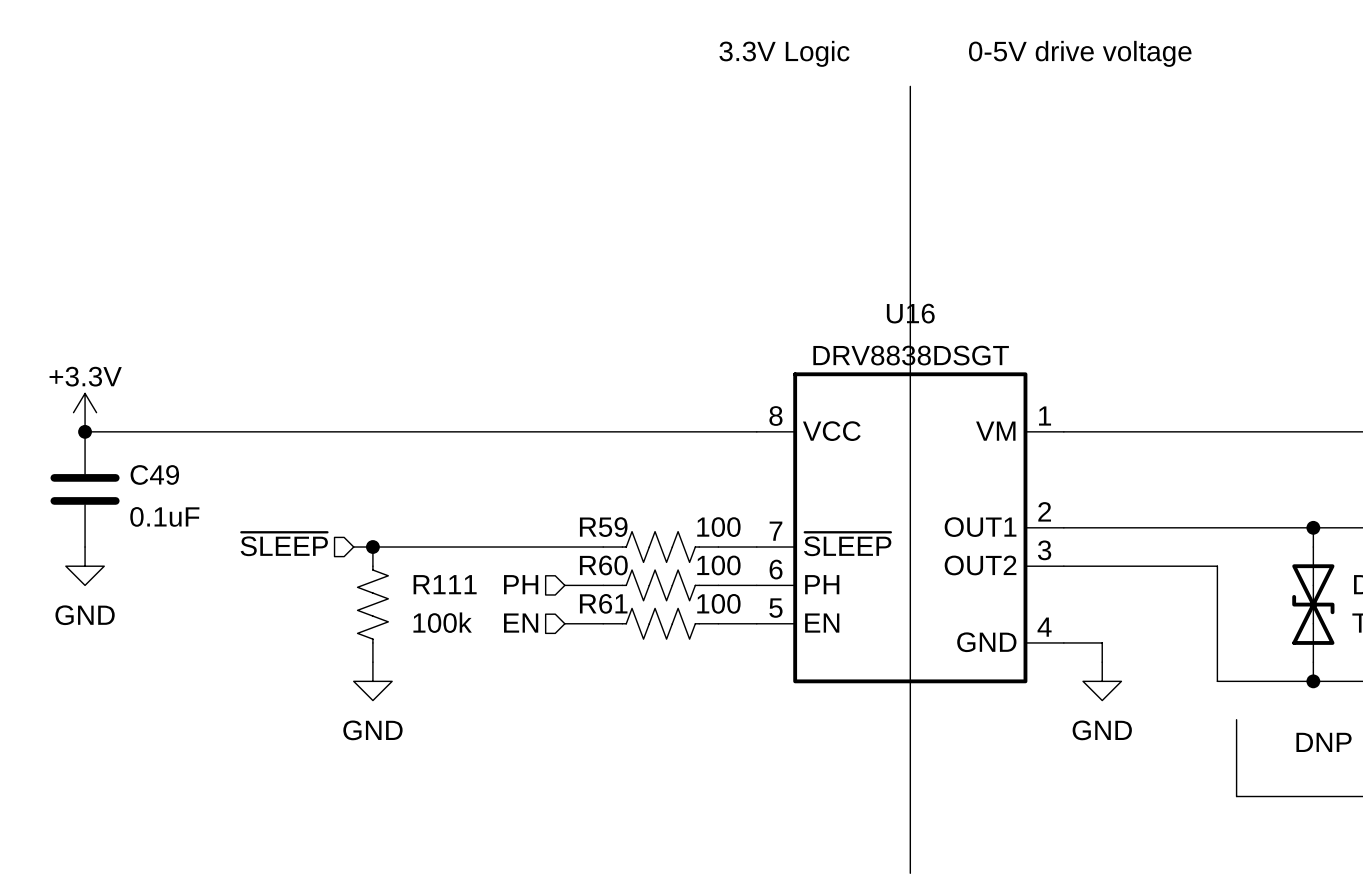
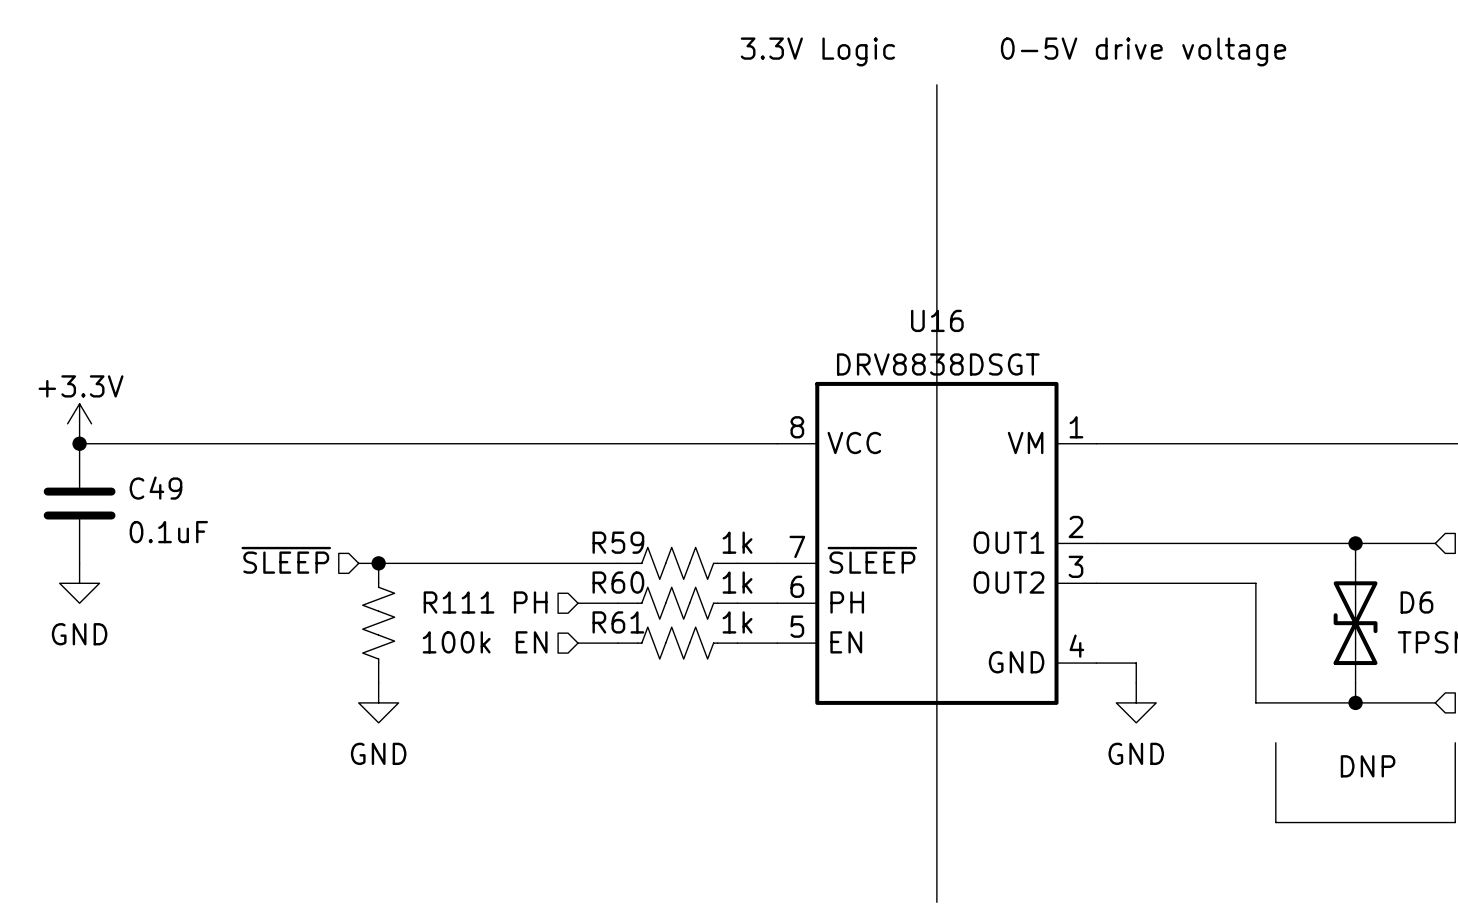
R59 value: 100 (718, 527) -> 1k (737, 542)
R60 value: 100 (718, 565) -> 1k (737, 582)
R61 value: 100 (718, 603) -> 1k (737, 622)

